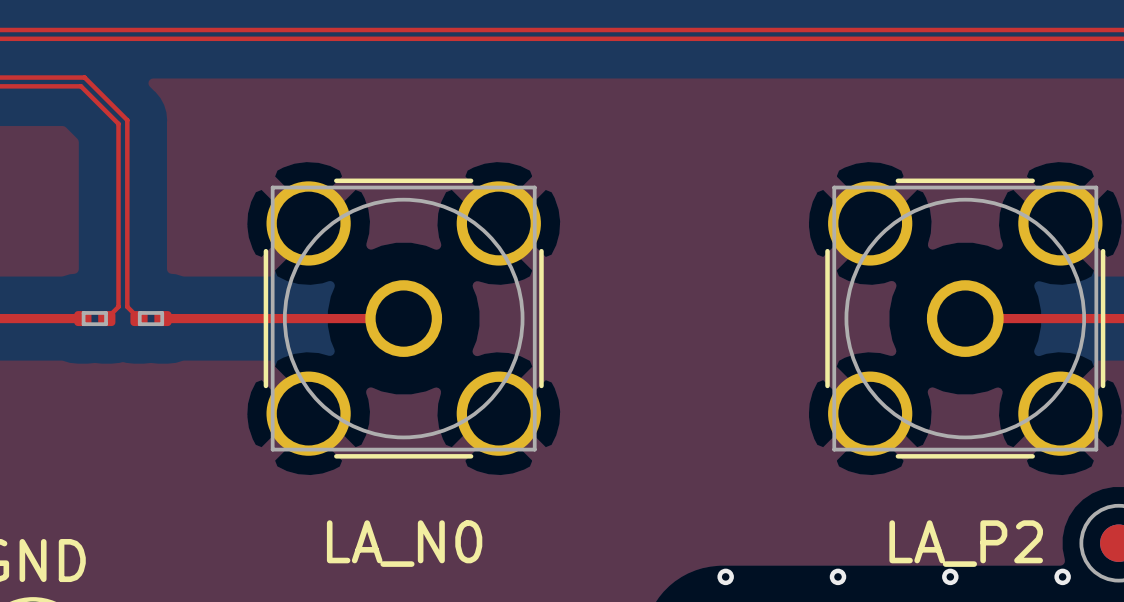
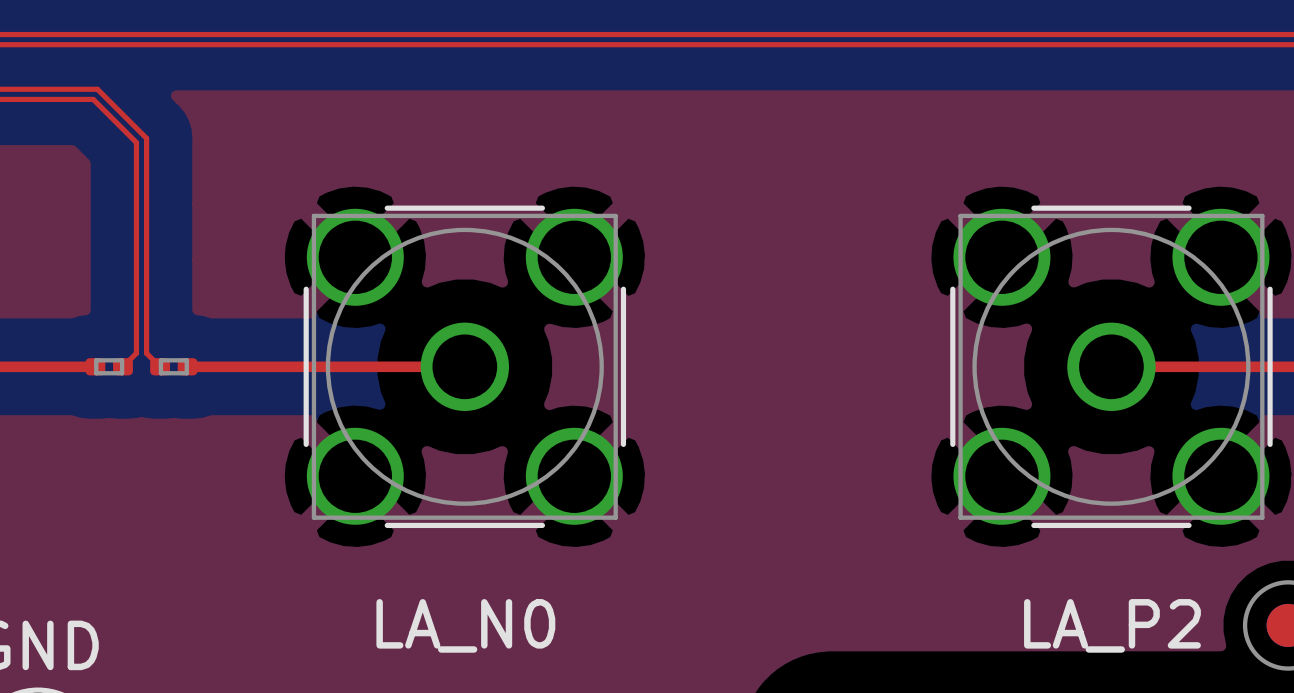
via: (725, 576) -> none
via: (838, 576) -> none
via: (950, 576) -> none
via: (1062, 576) -> none

